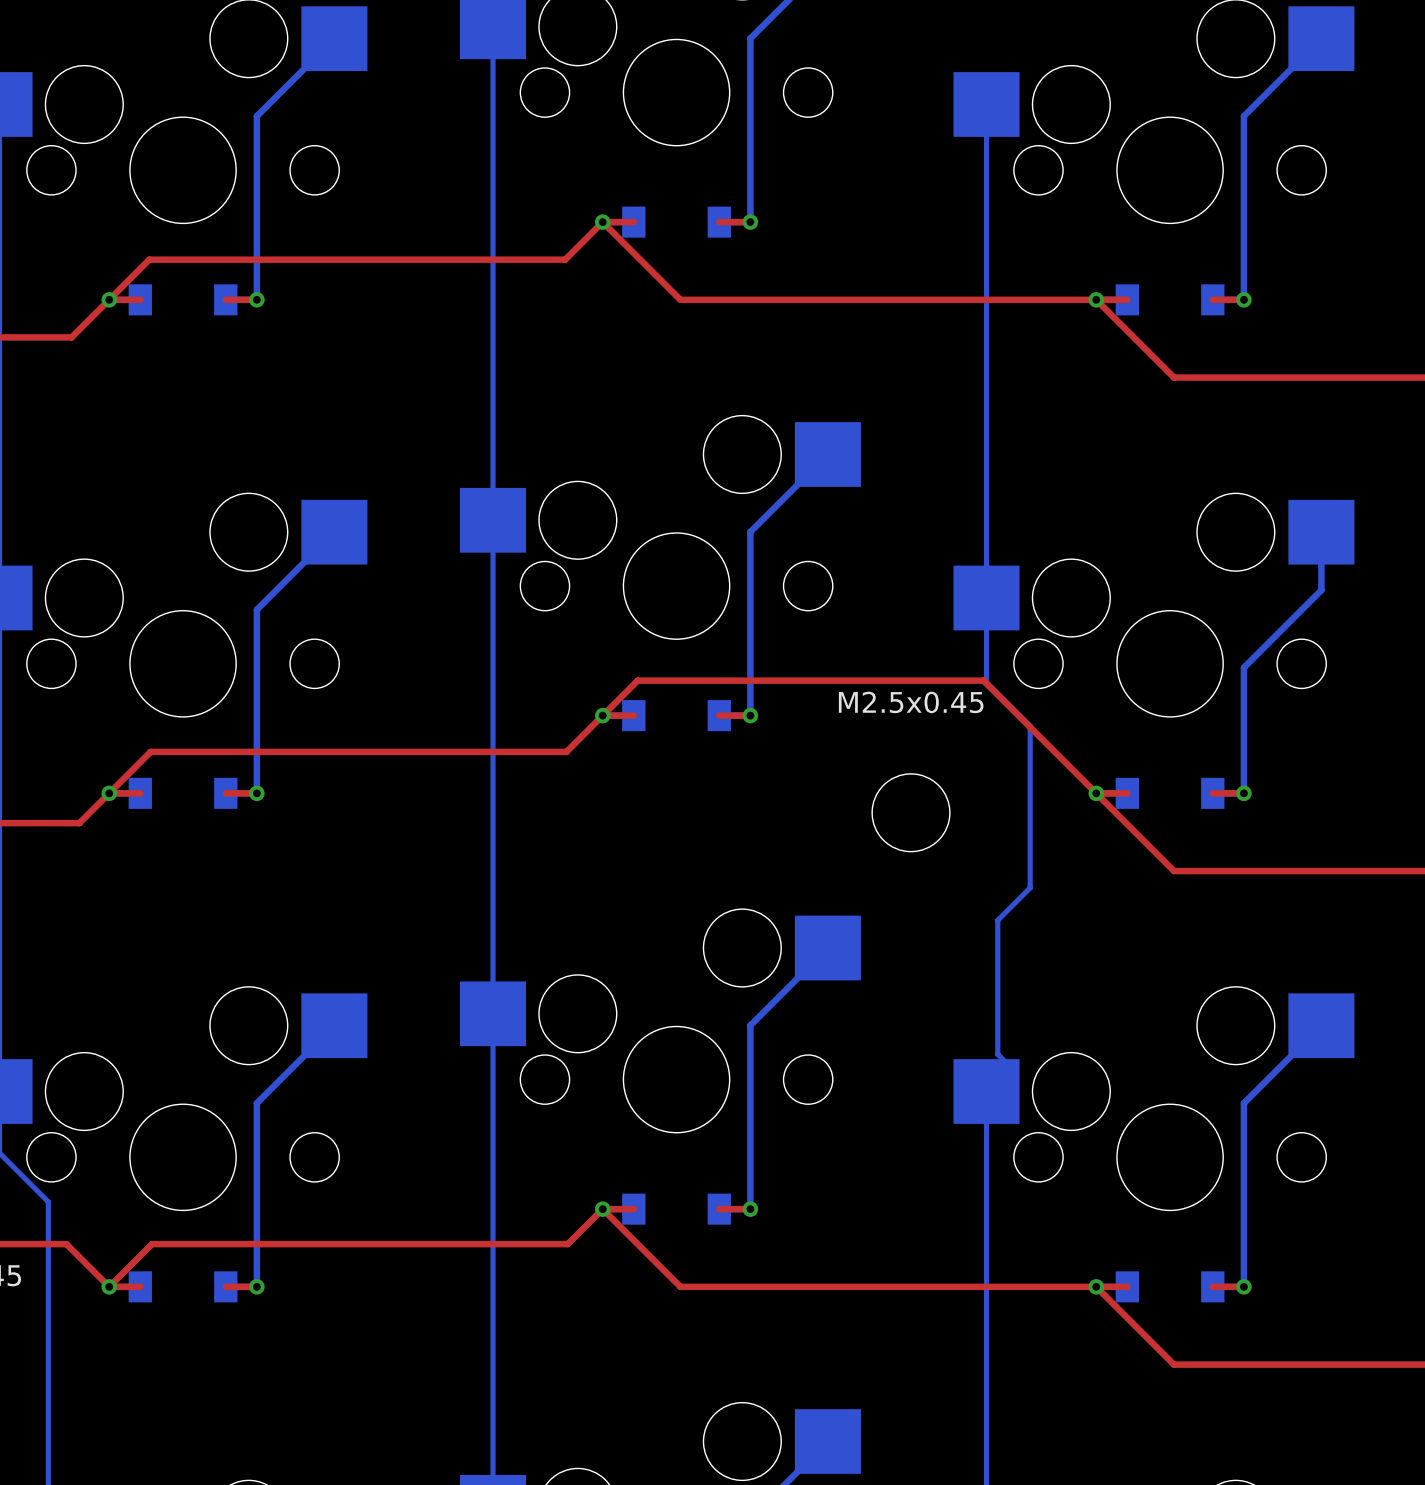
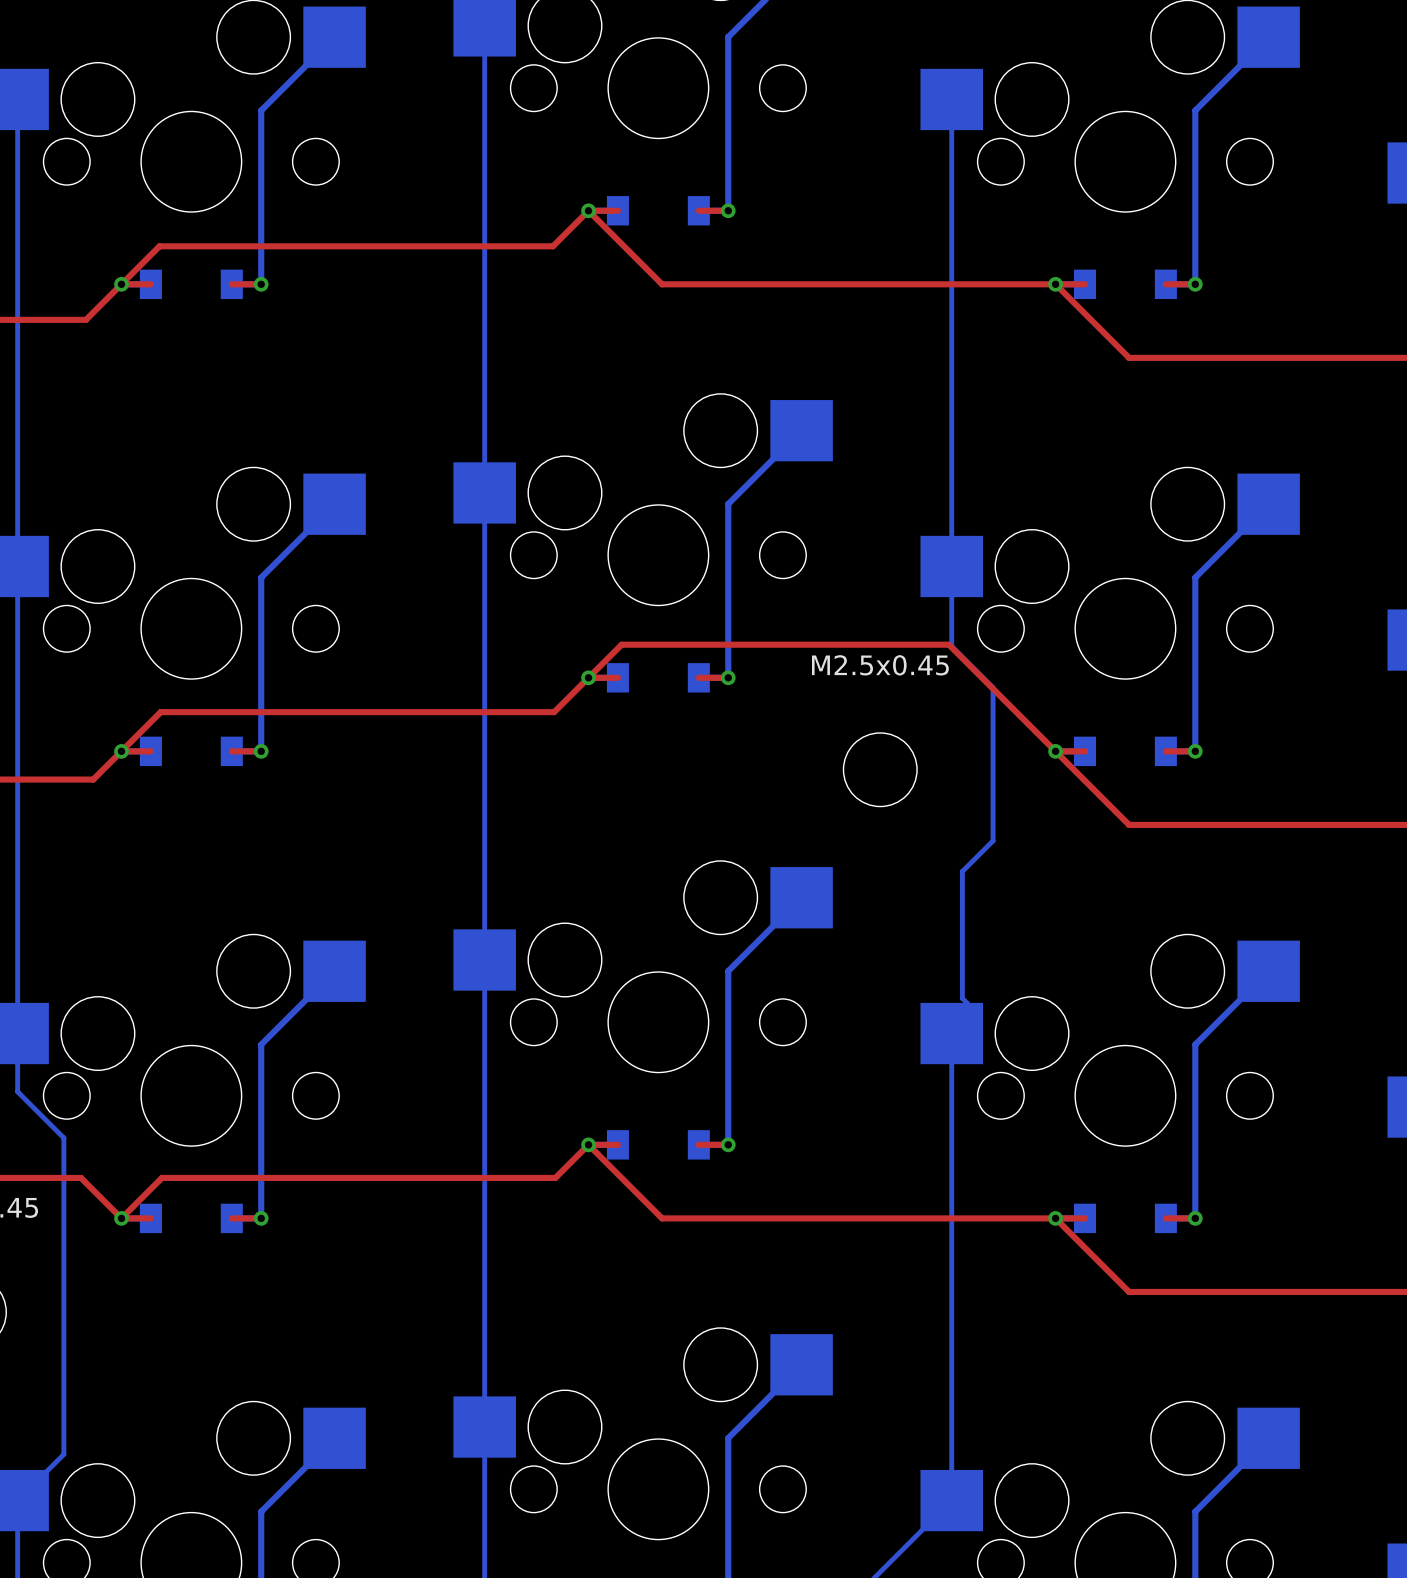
bottom track: (1321, 532) (1321, 590) (1243, 667) -> (1268, 504) (1195, 577) (1195, 632)

